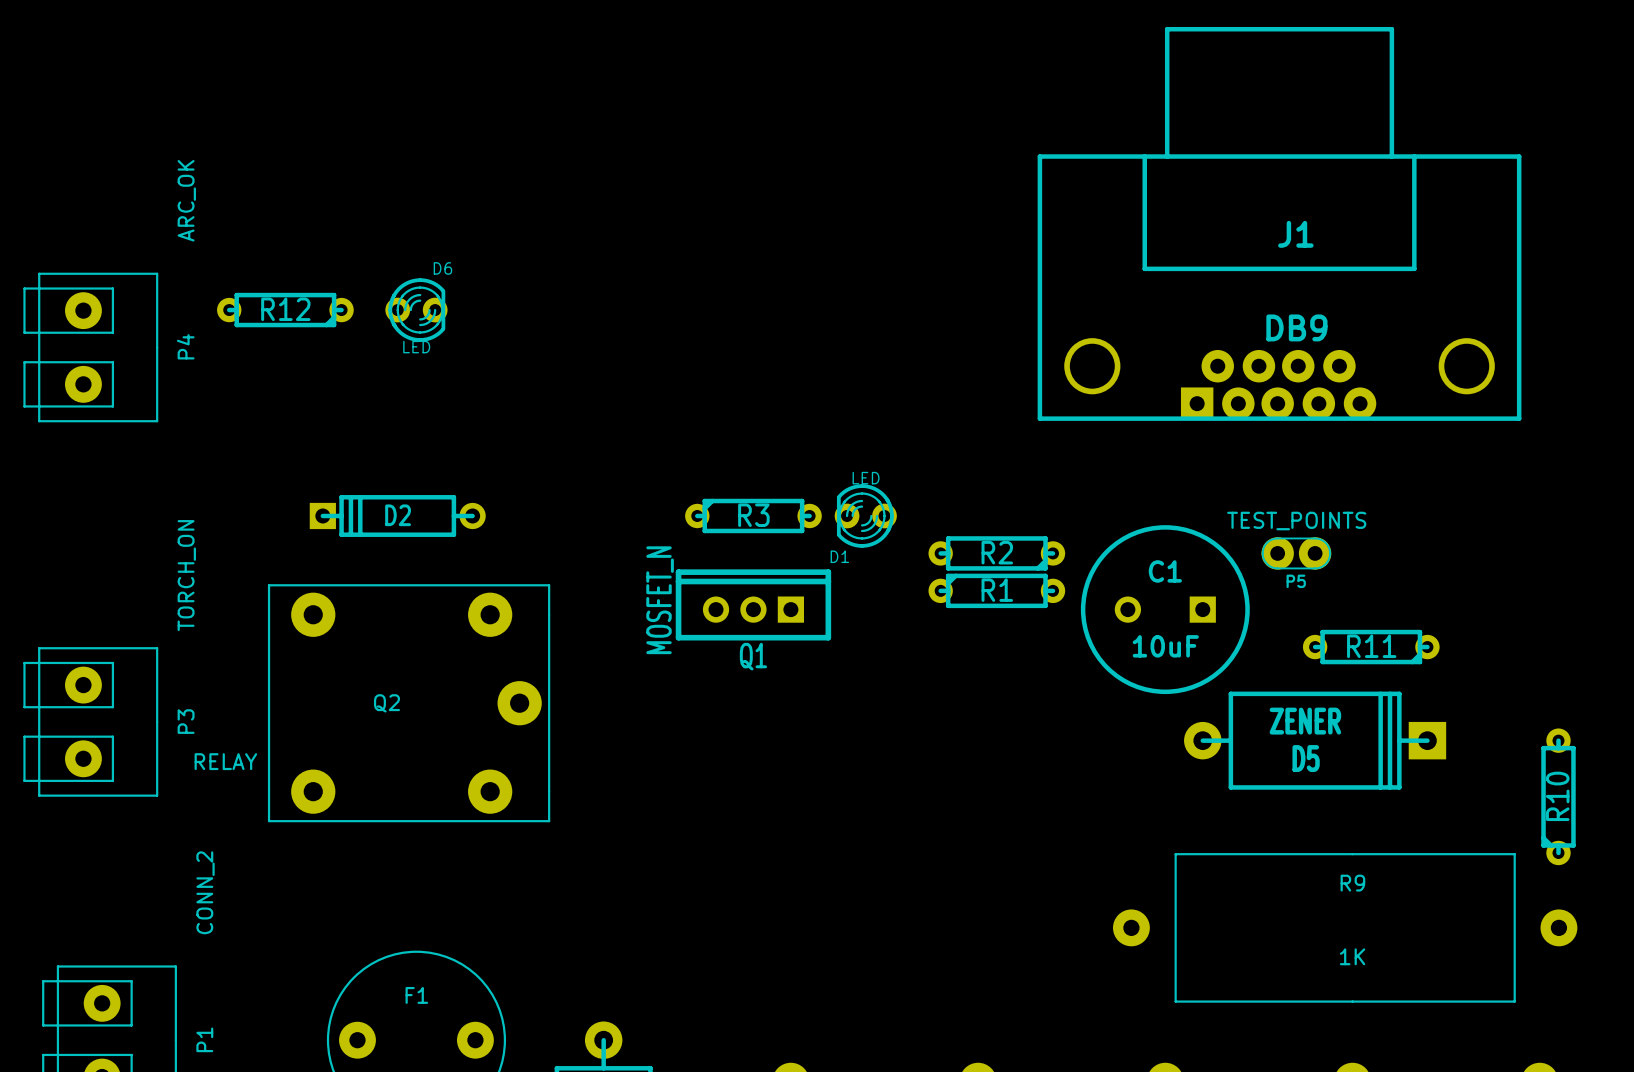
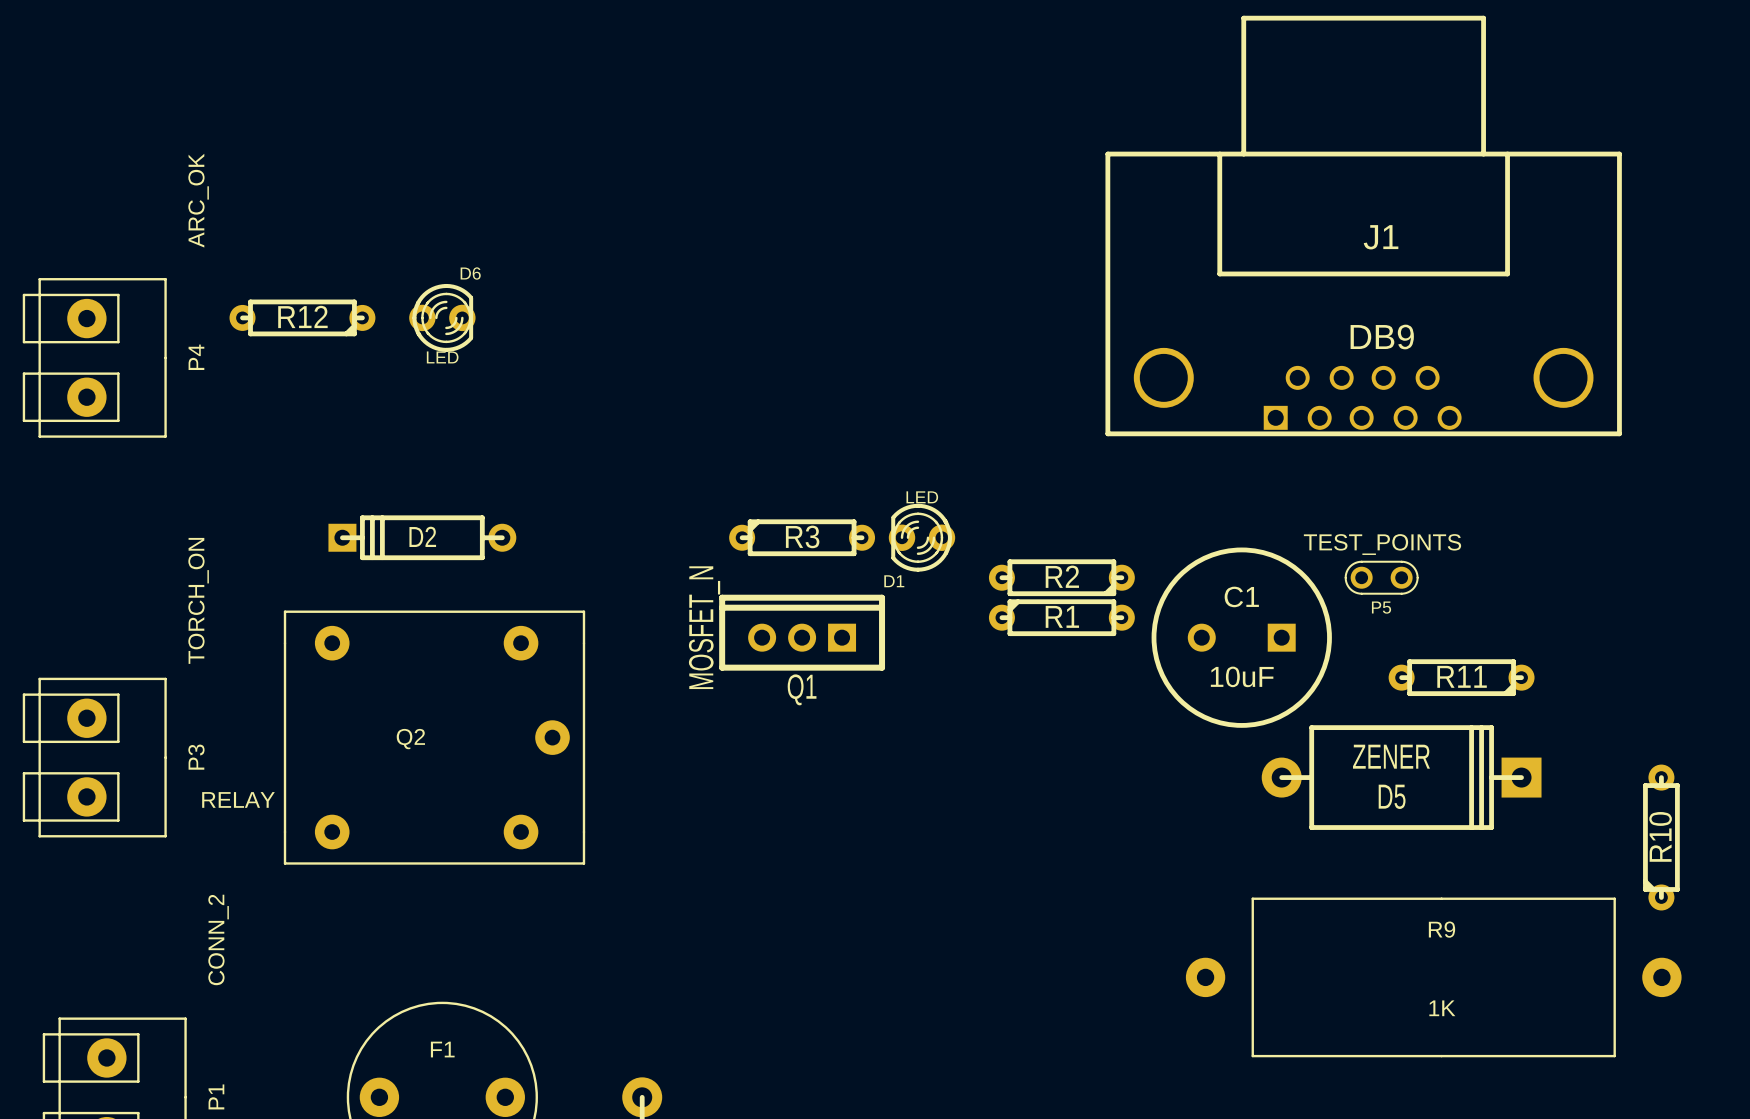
J1 footprint: [1037, 26, 1522, 421] -> [1105, 15, 1622, 437]
P5 footprint: [1261, 537, 1332, 570] -> [1344, 560, 1419, 595]
Q2 footprint: [267, 584, 551, 823] -> [283, 610, 586, 865]

